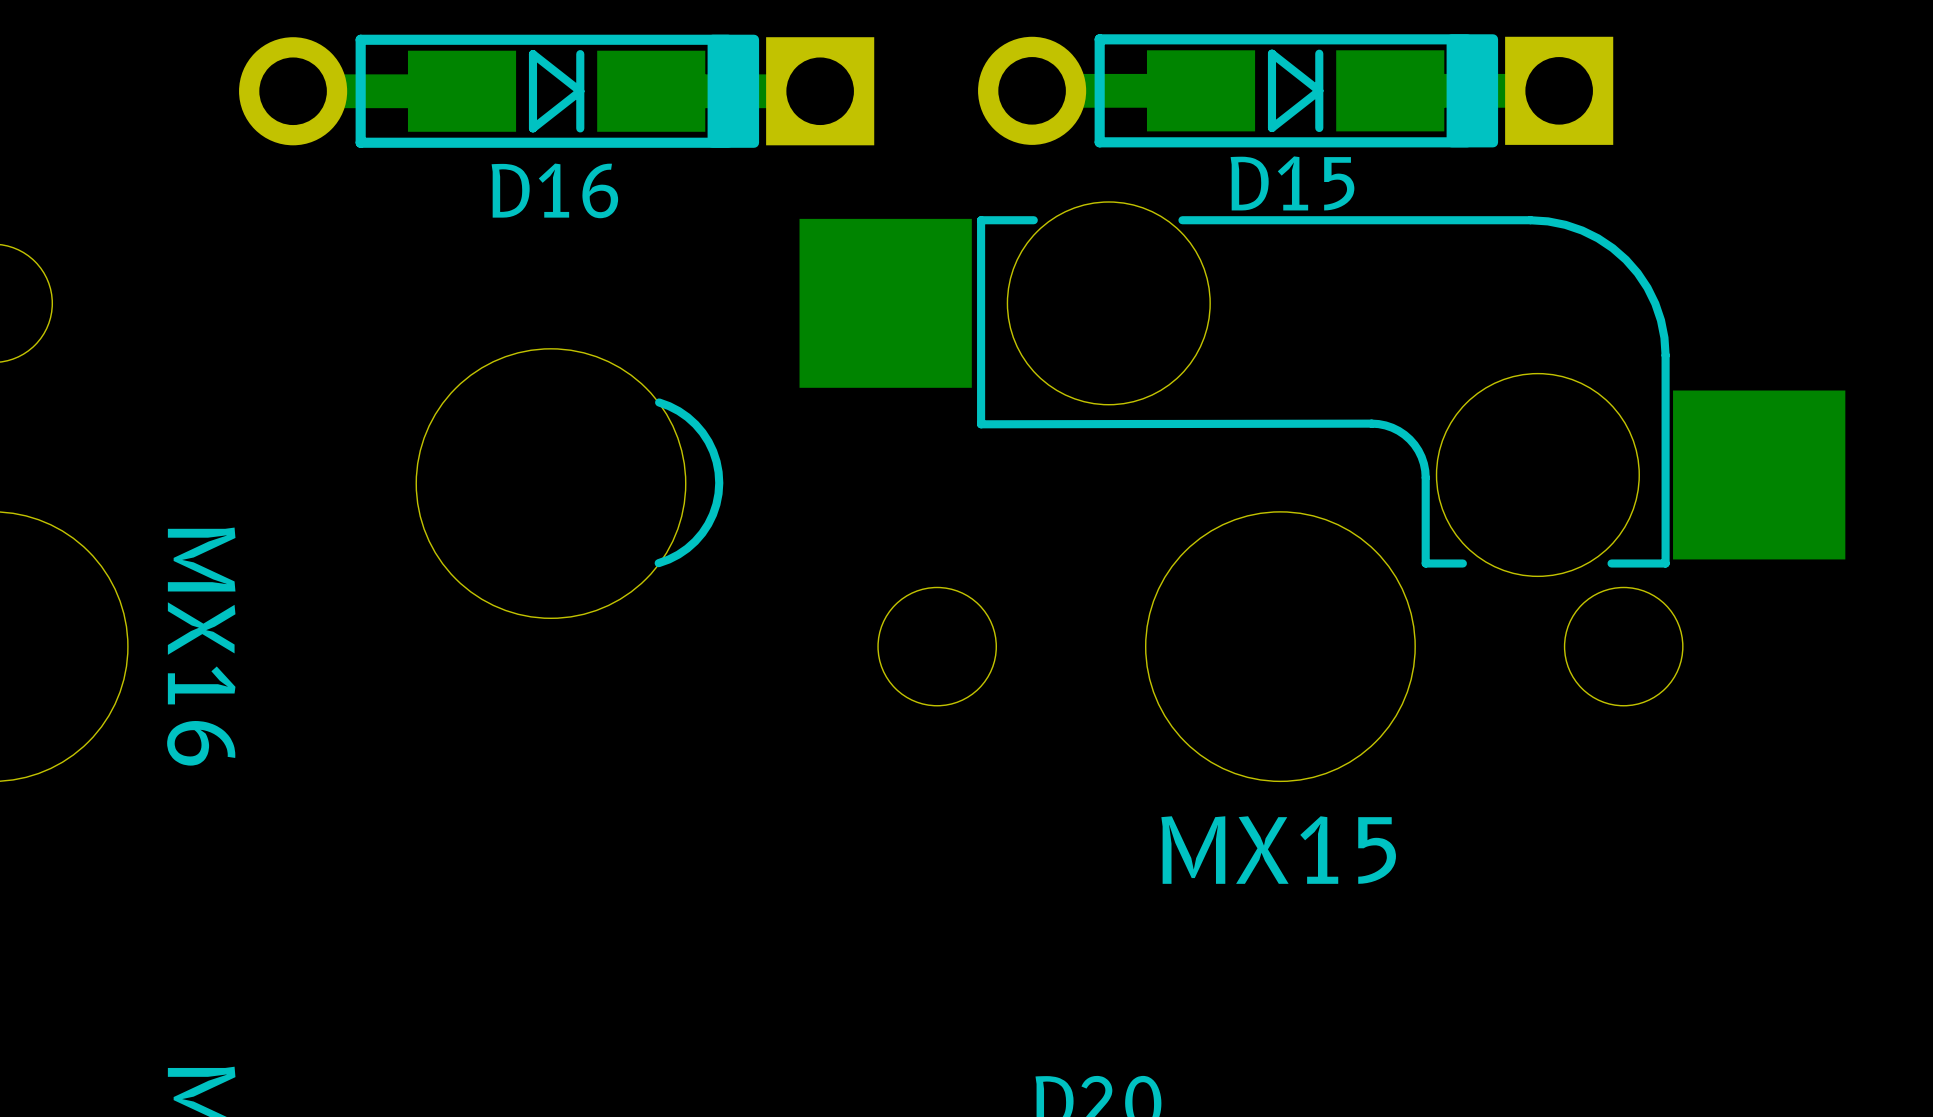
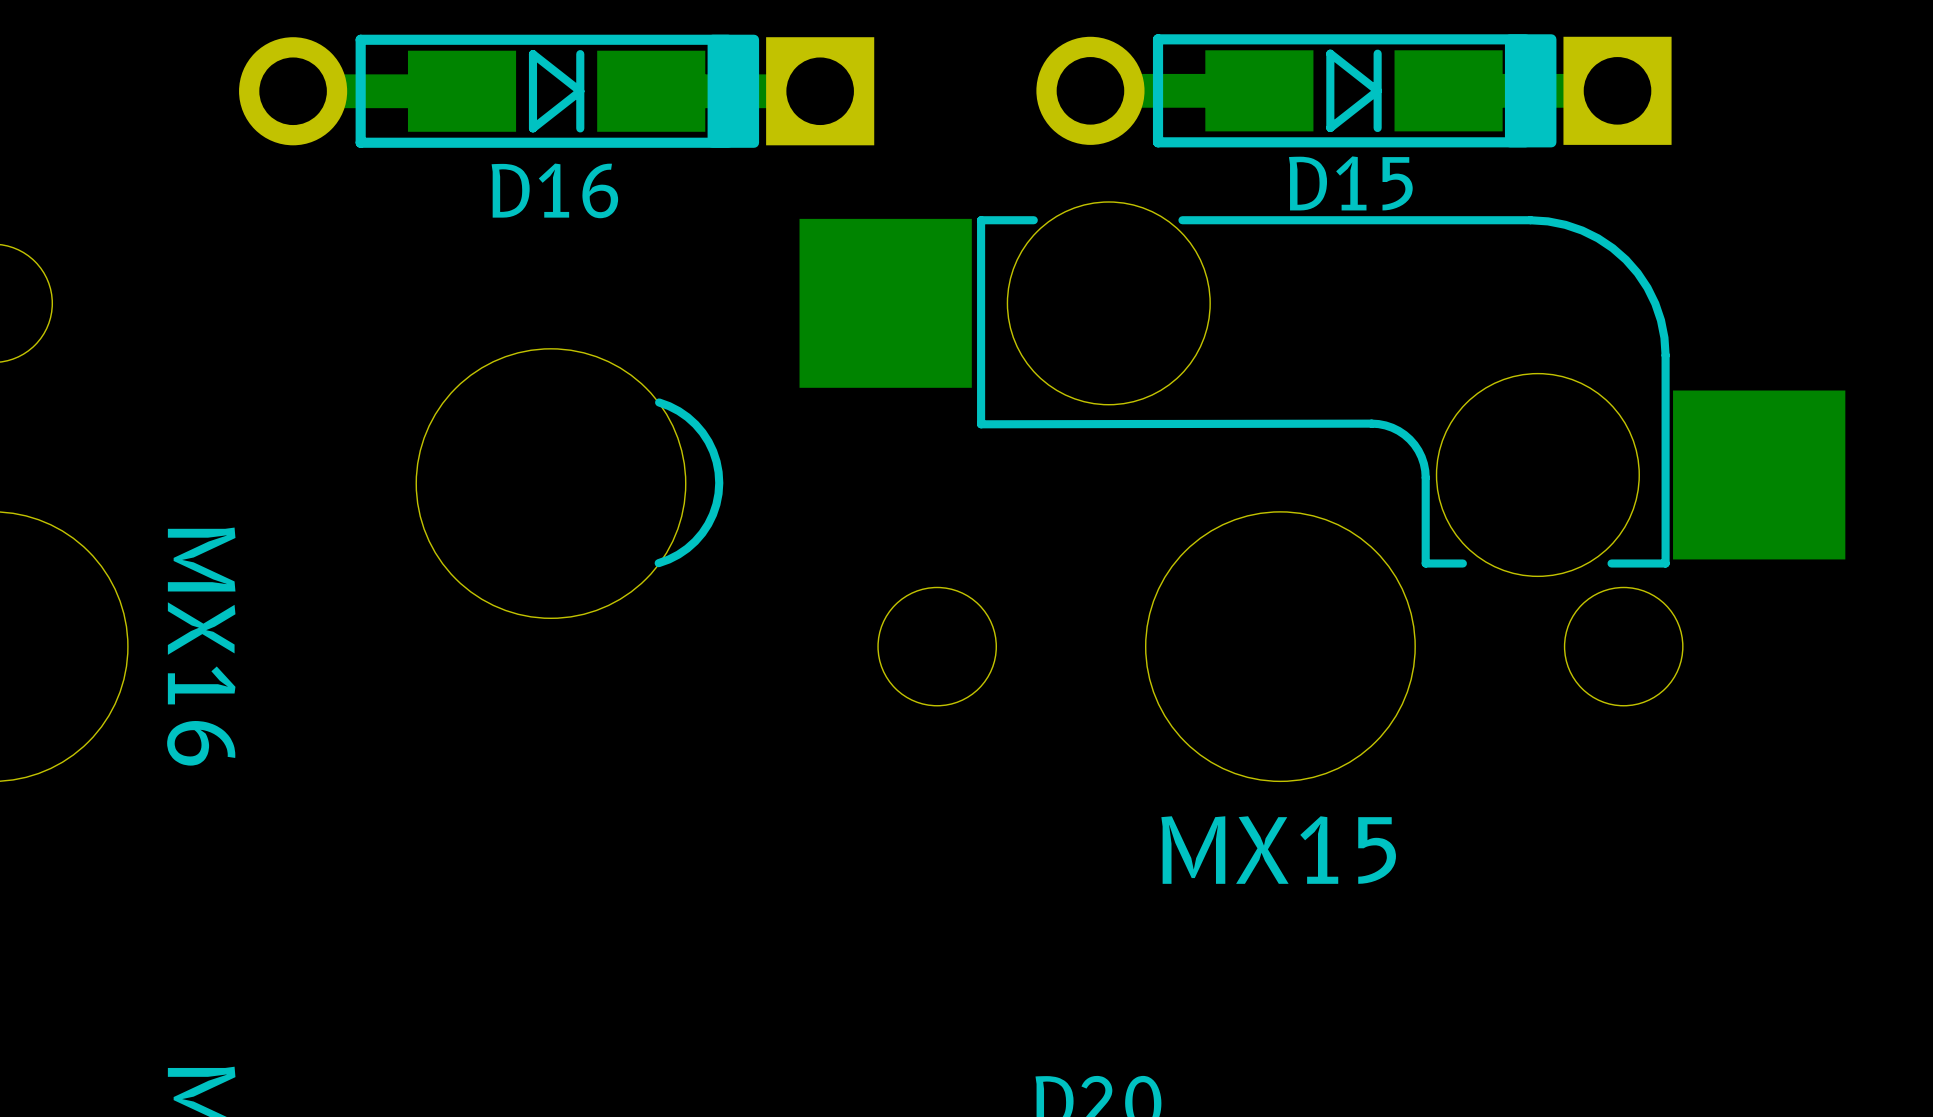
D15 position: (1295, 90) -> (1353, 90)

